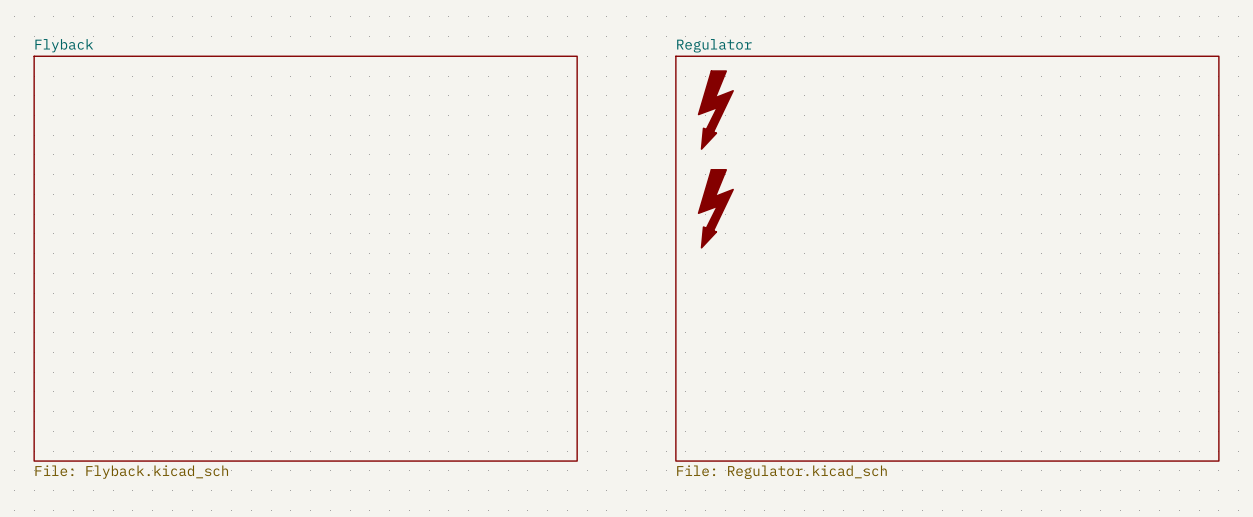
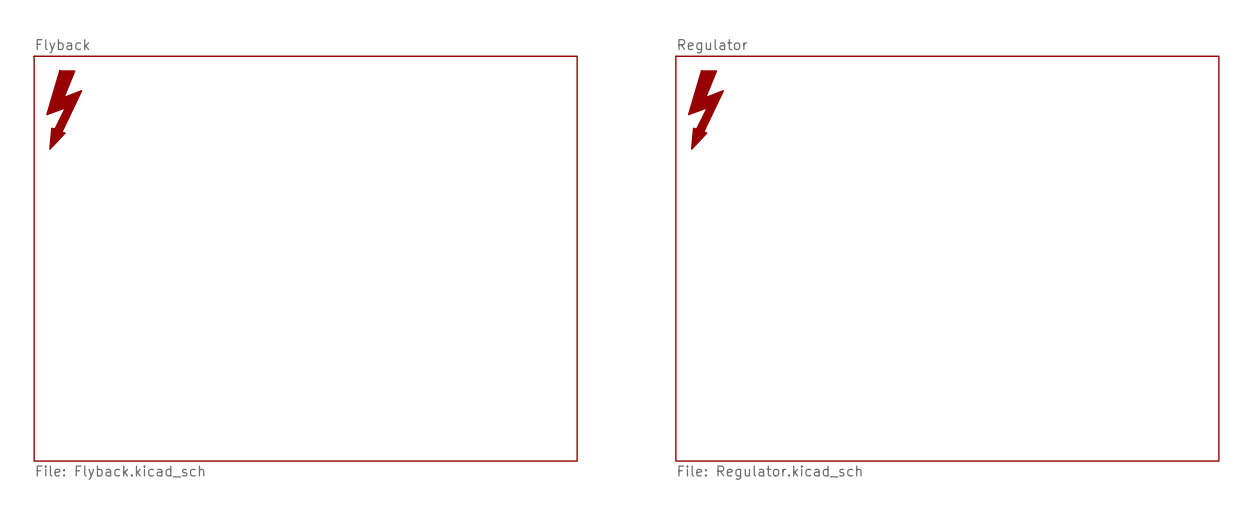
power symbol: none -> (64, 110)
power symbol: none -> (705, 110)
part: (715, 110) -> none
part: (715, 208) -> none

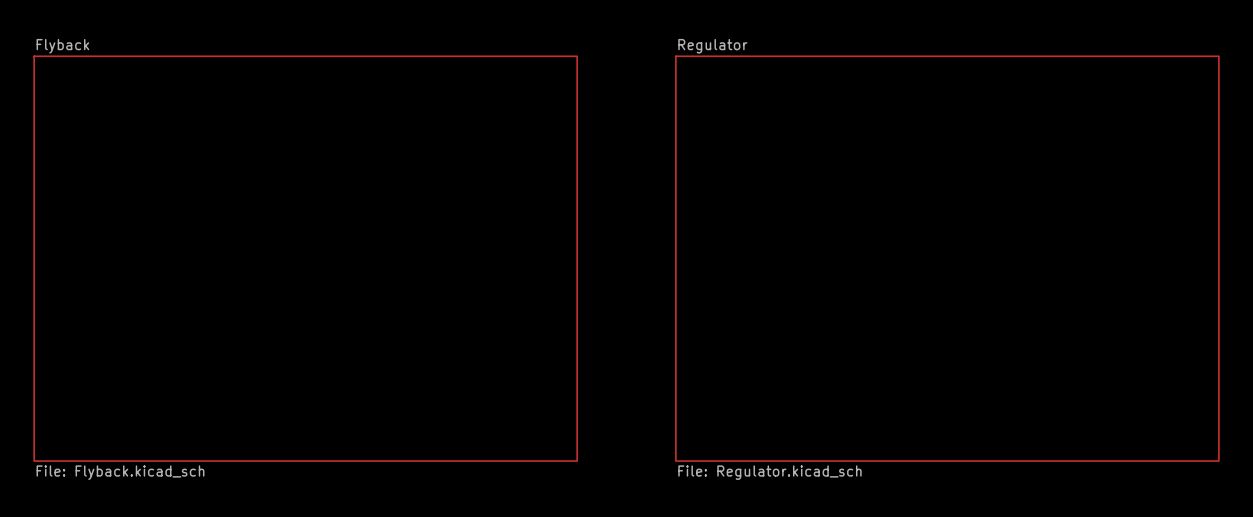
power symbol: (64, 110) -> none
power symbol: (705, 110) -> none

